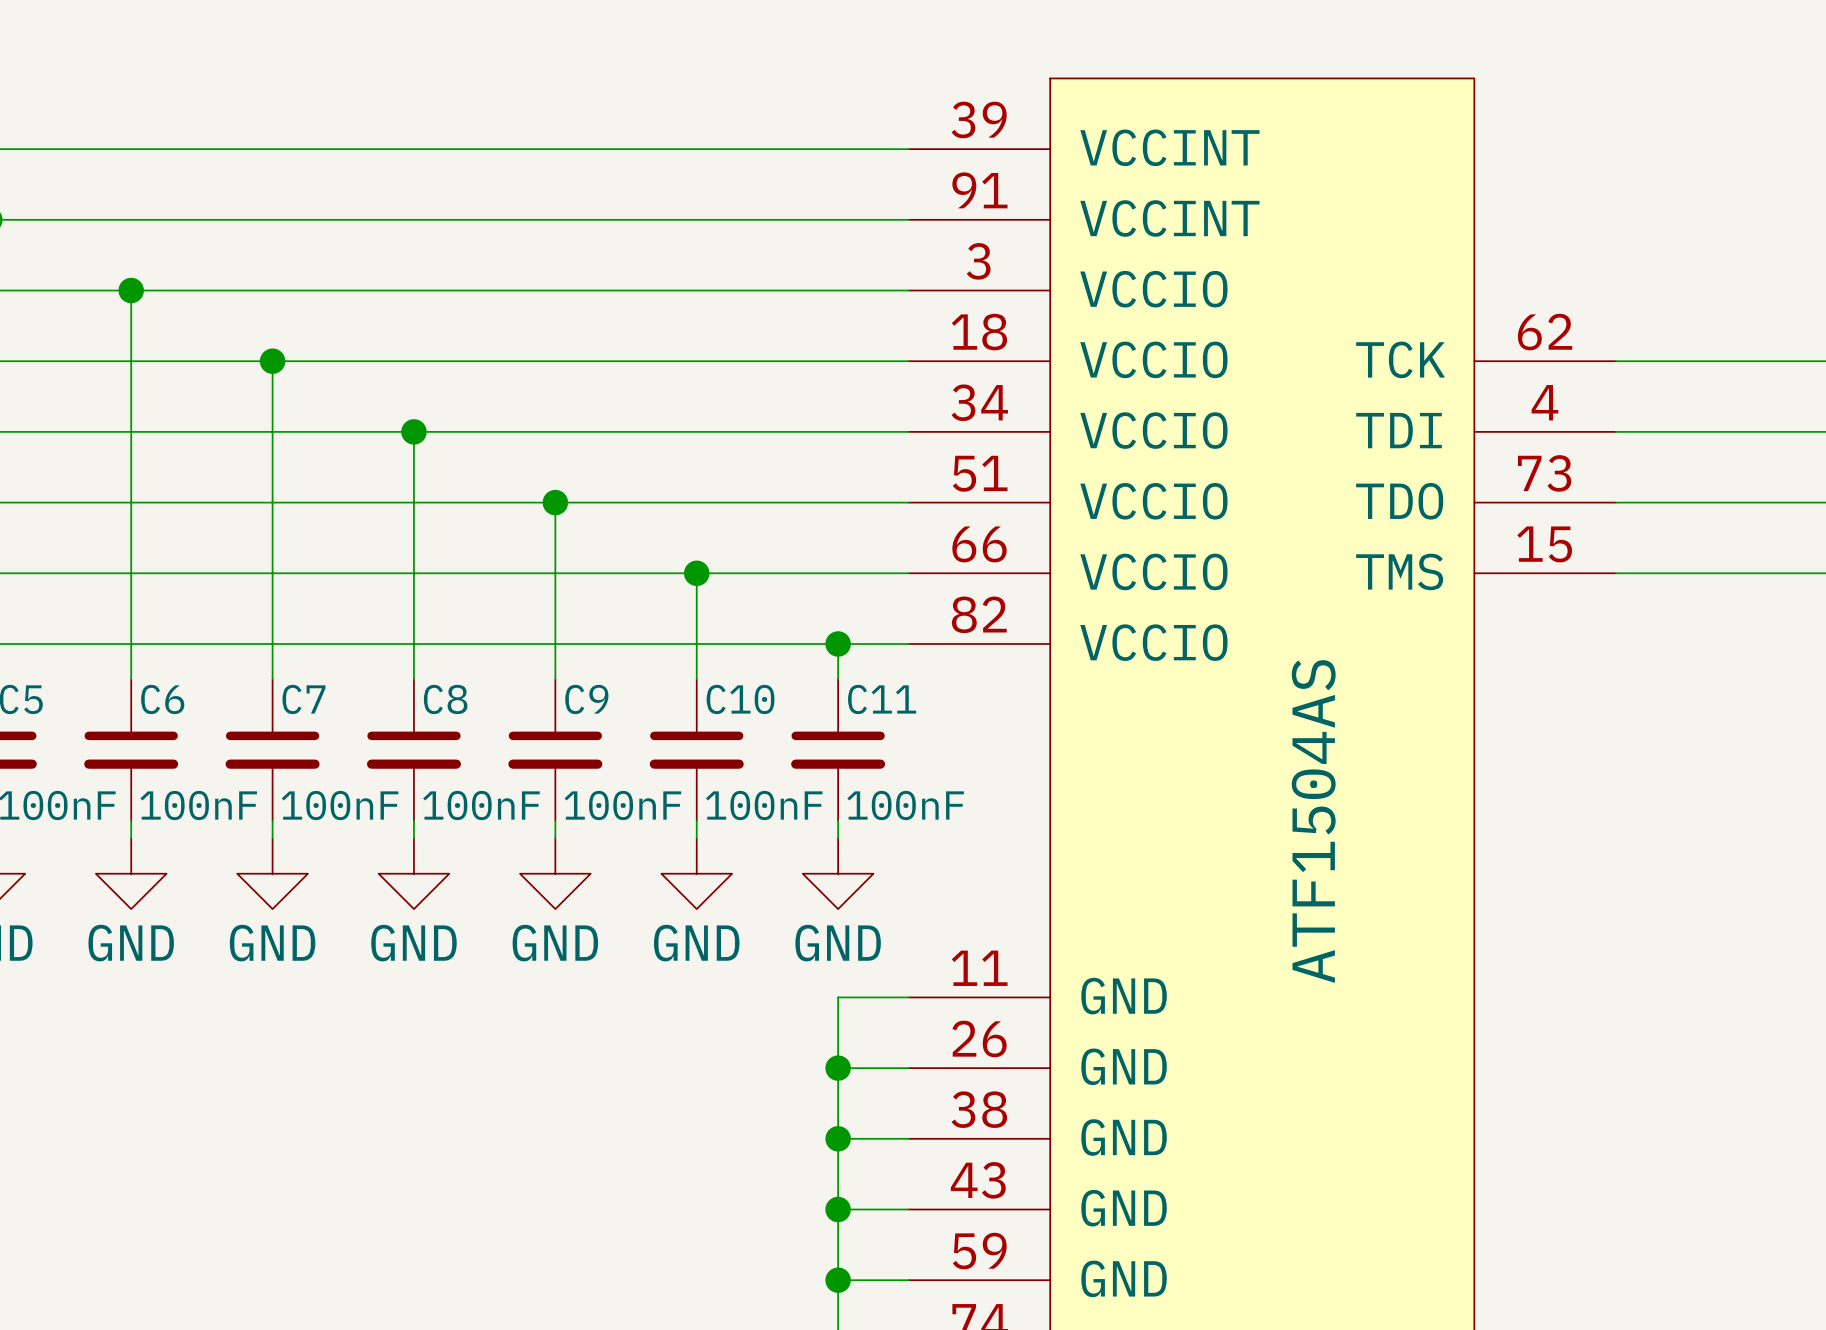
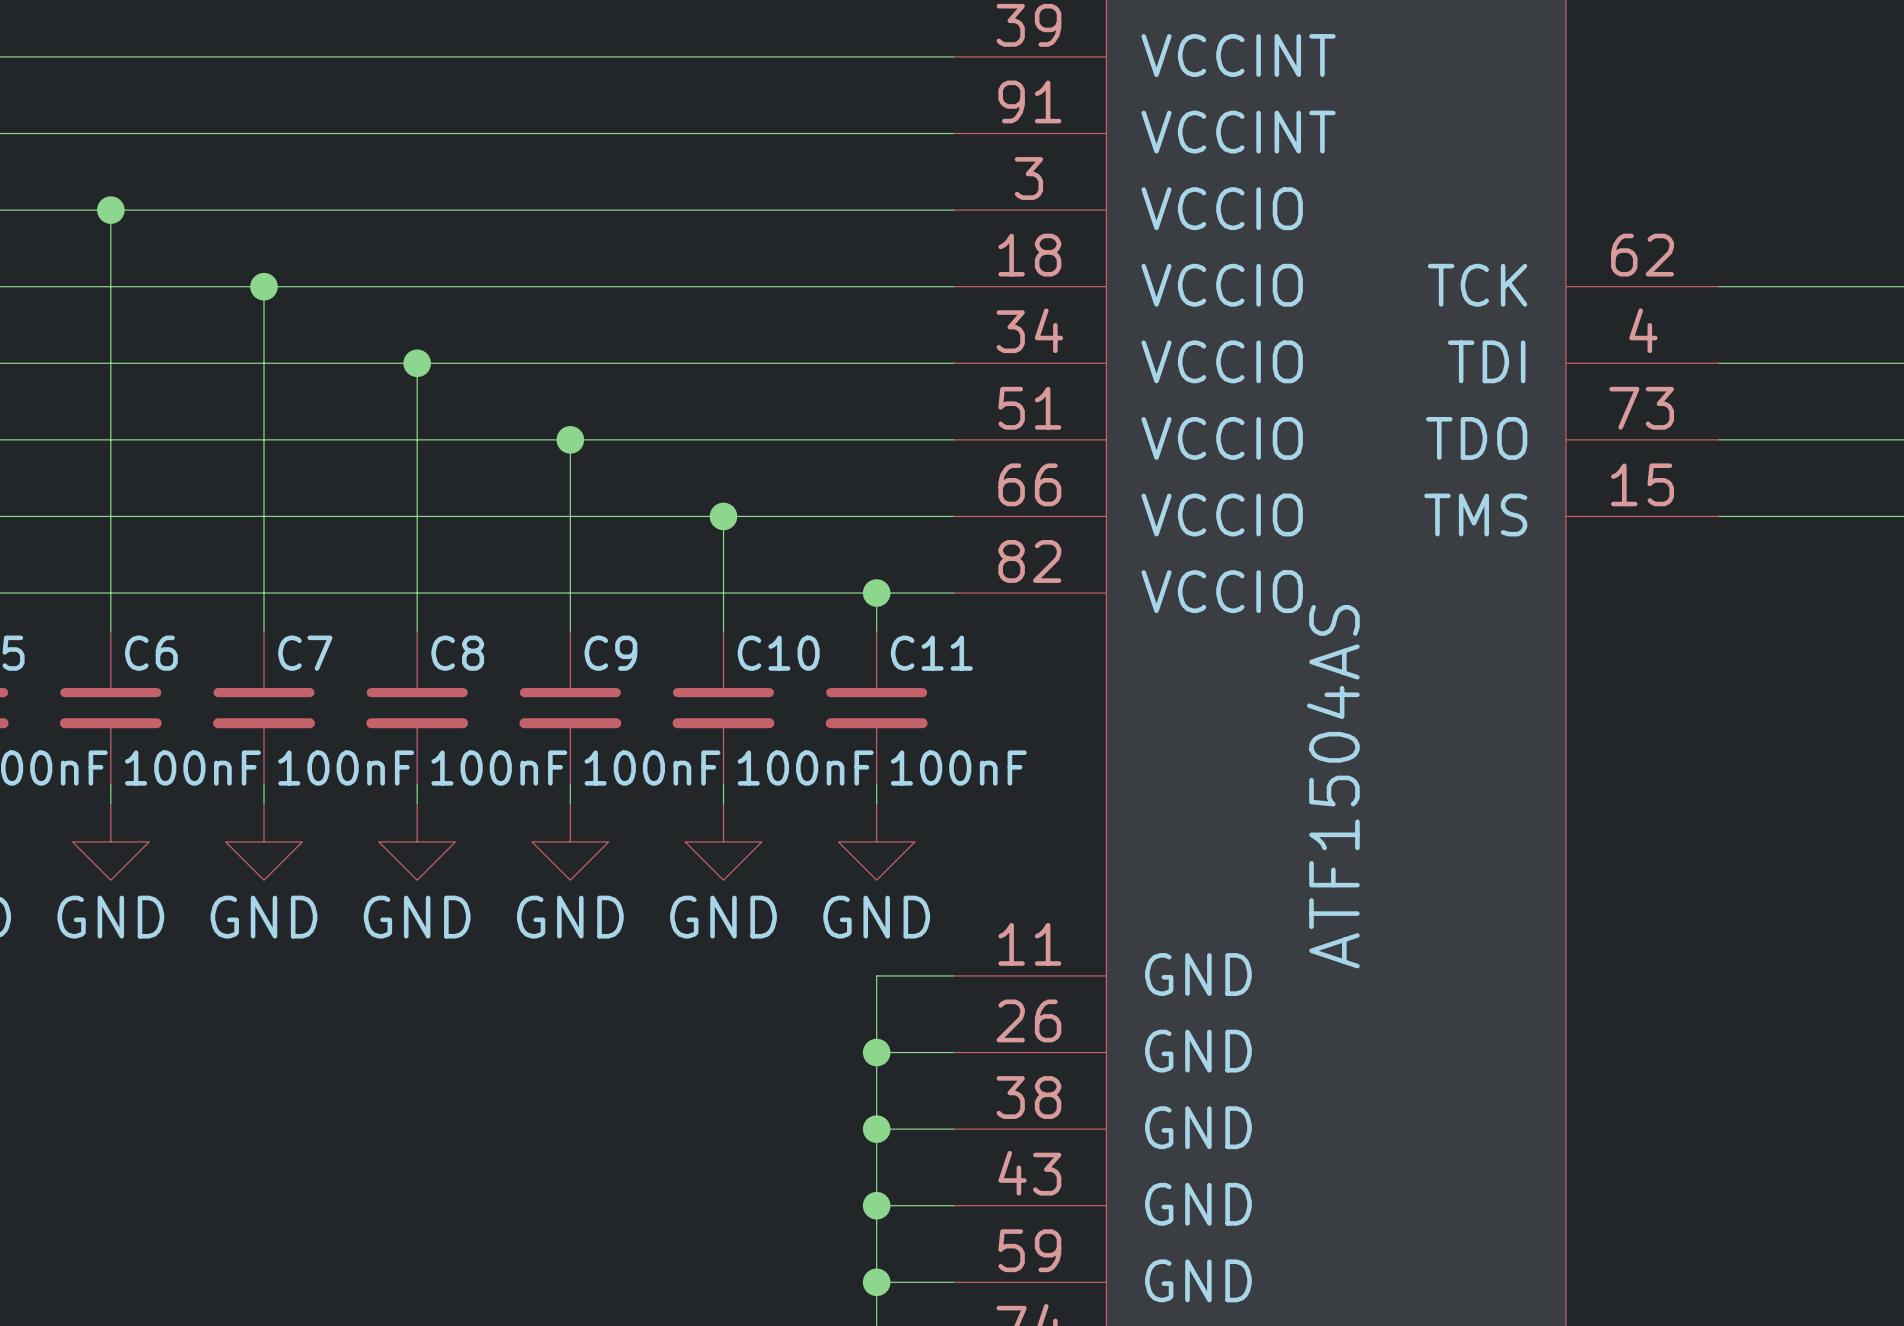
part value position: ATF1504AS (1313, 821) -> ATF1504AS (1333, 786)

